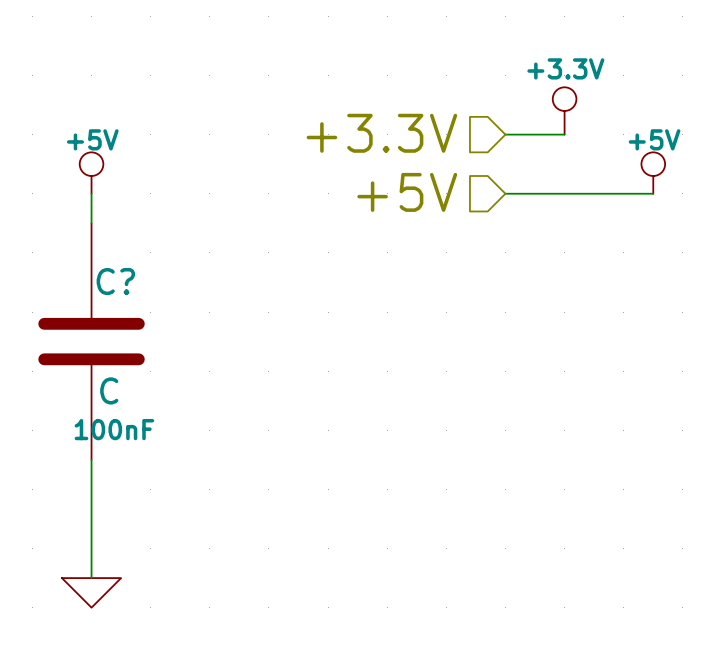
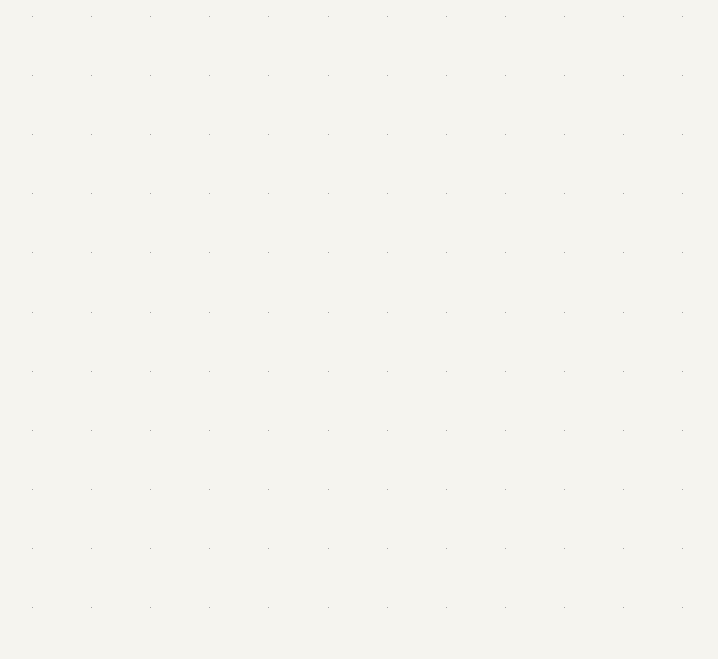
power symbol: +3.3V (564, 110) -> none
hierarchical label: +3.3V (381, 133) -> none
wire: (505, 134) (564, 134) -> none
power symbol: +5V (91, 173) -> none
power symbol: +5V (653, 173) -> none
hierarchical label: +5V (407, 192) -> none
wire: (91, 193) (91, 223) -> none
wire: (505, 193) (653, 193) -> none
C?: C (91, 341) -> none
wire: (91, 459) (91, 578) -> none
power symbol: (91, 592) -> none

